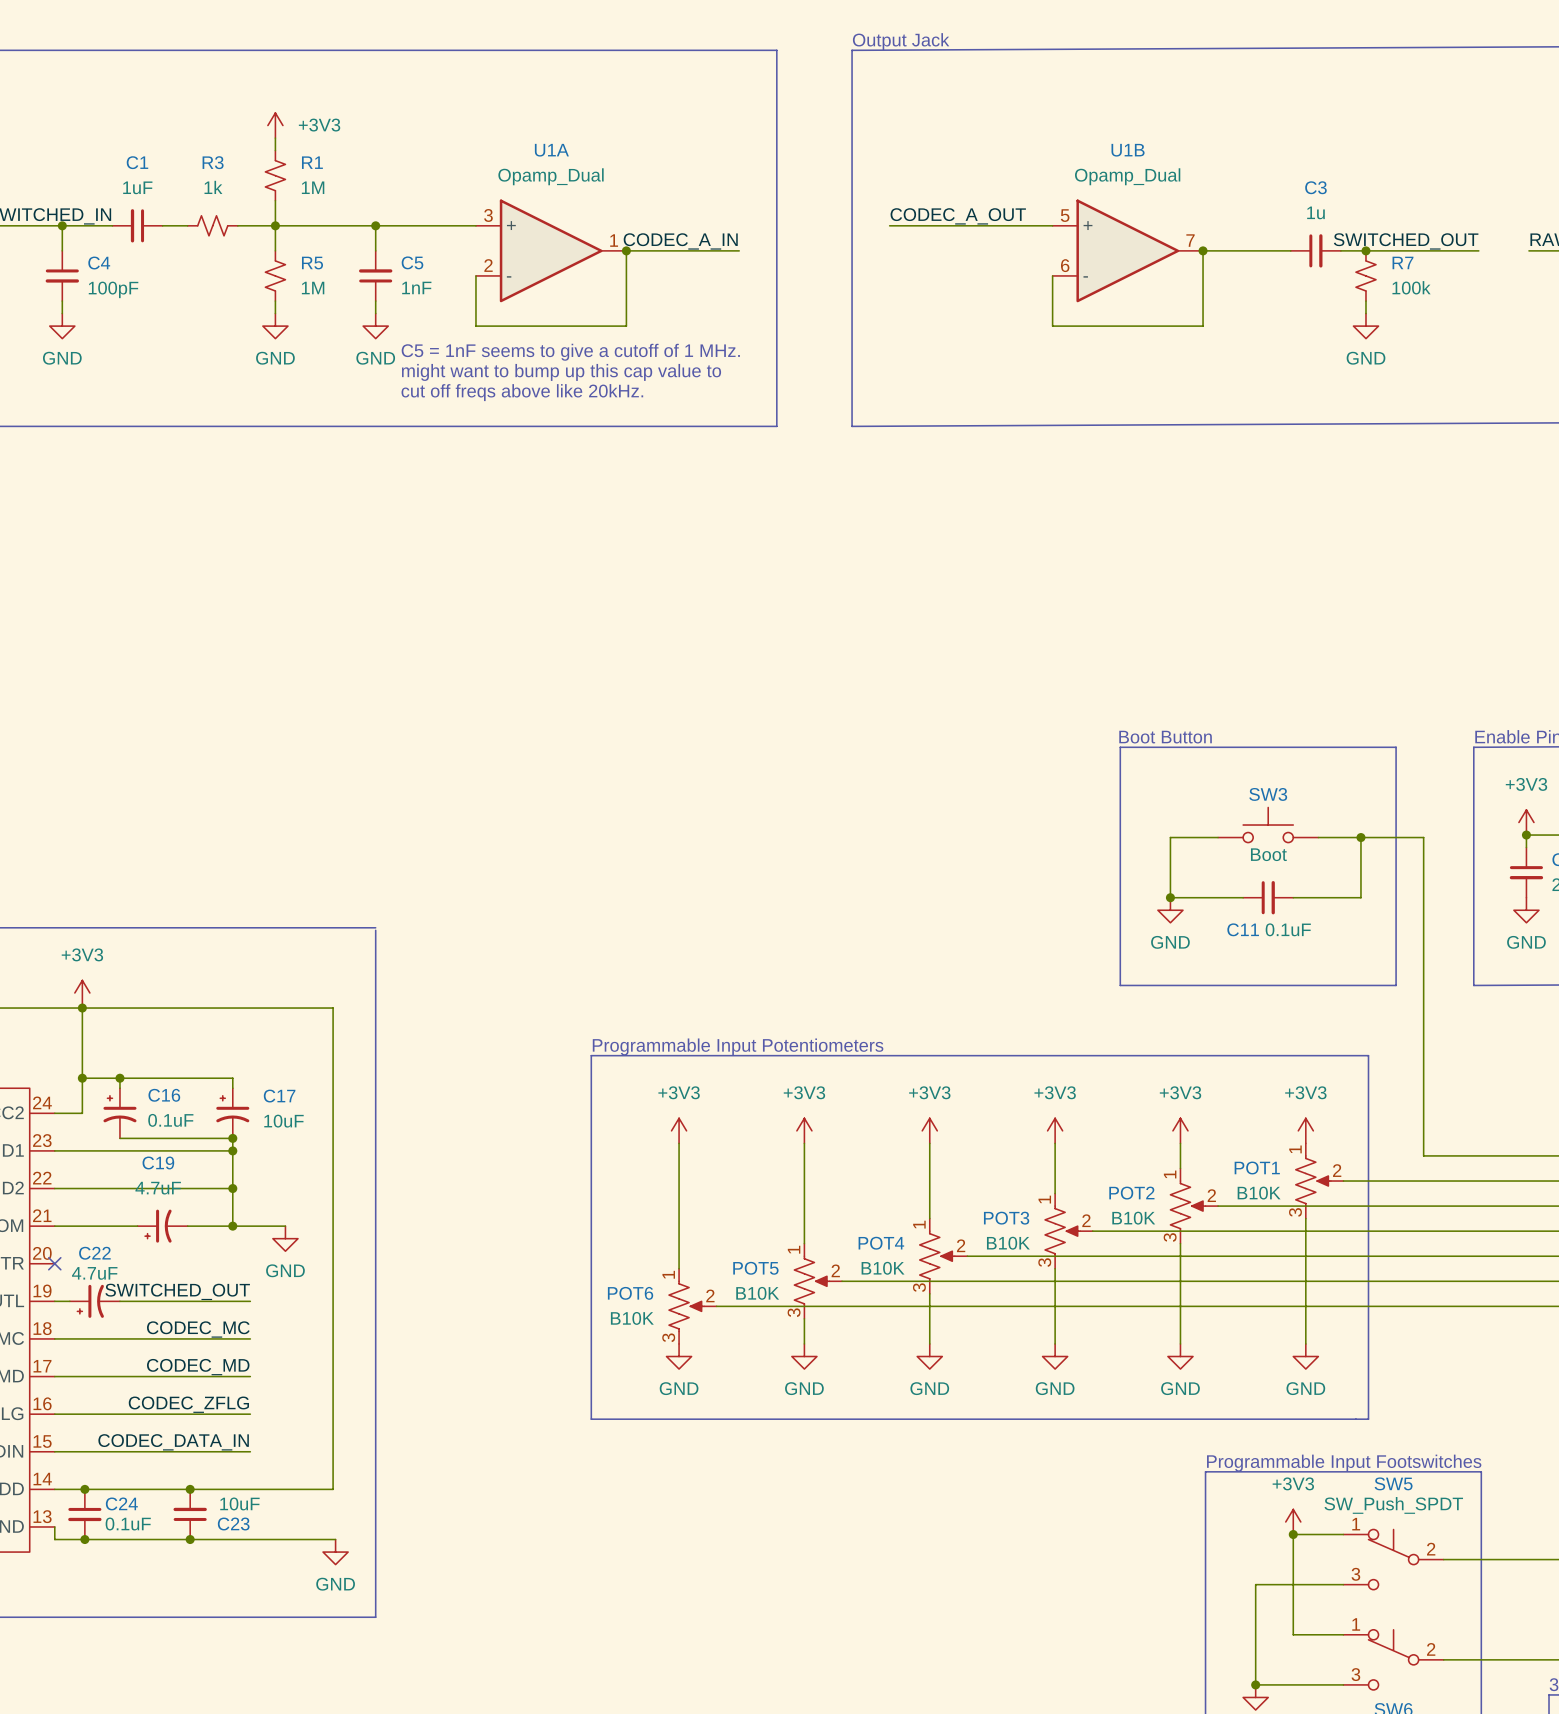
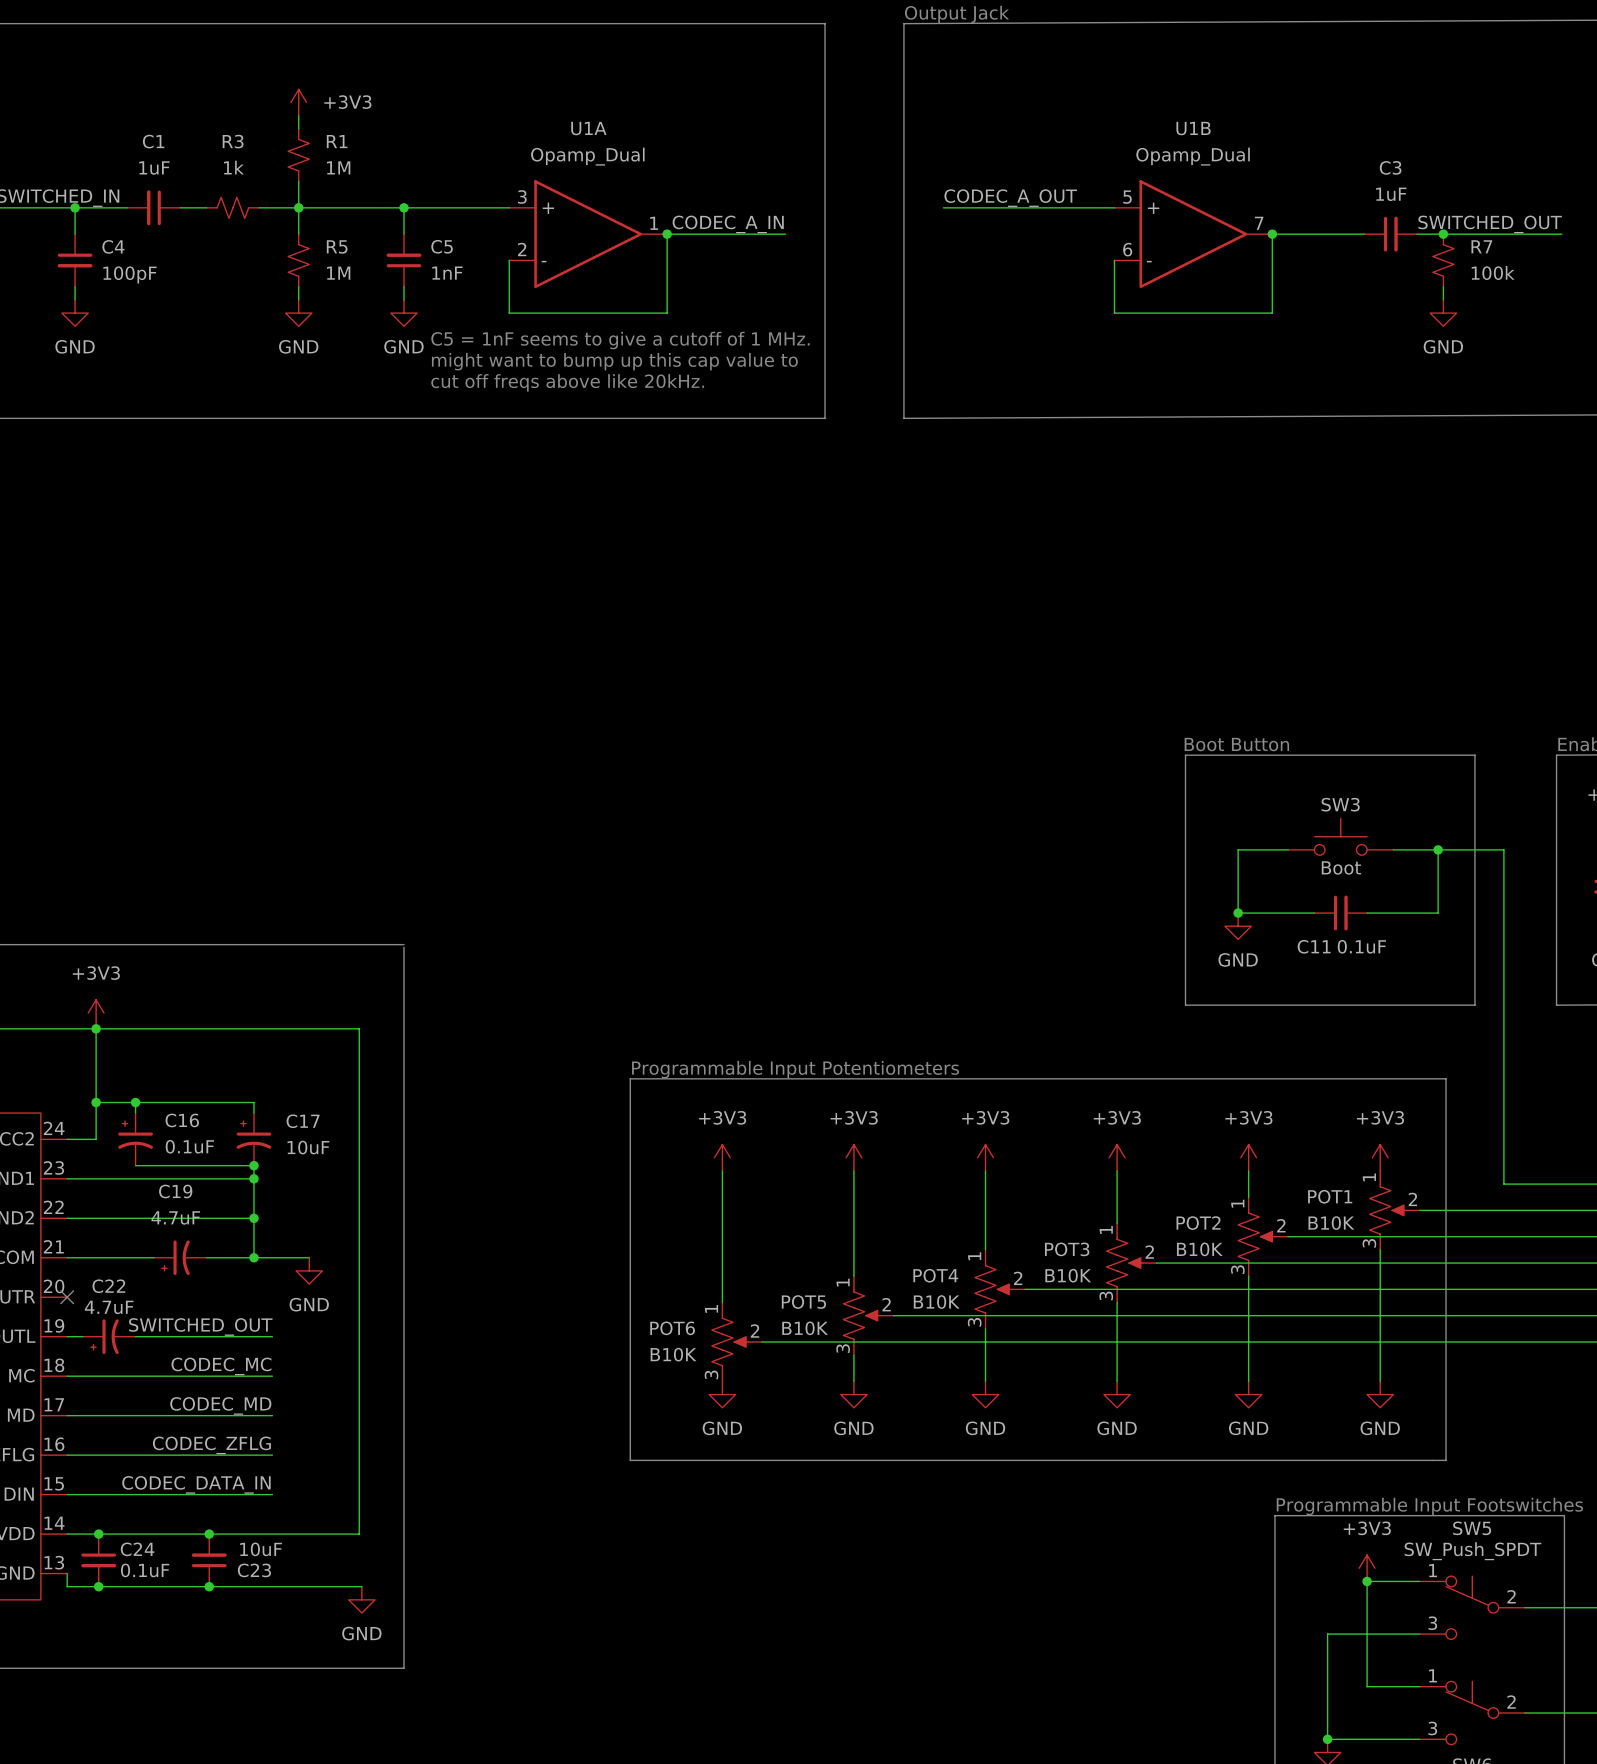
C3 value: 1u (1316, 212) -> 1uF (1391, 194)

